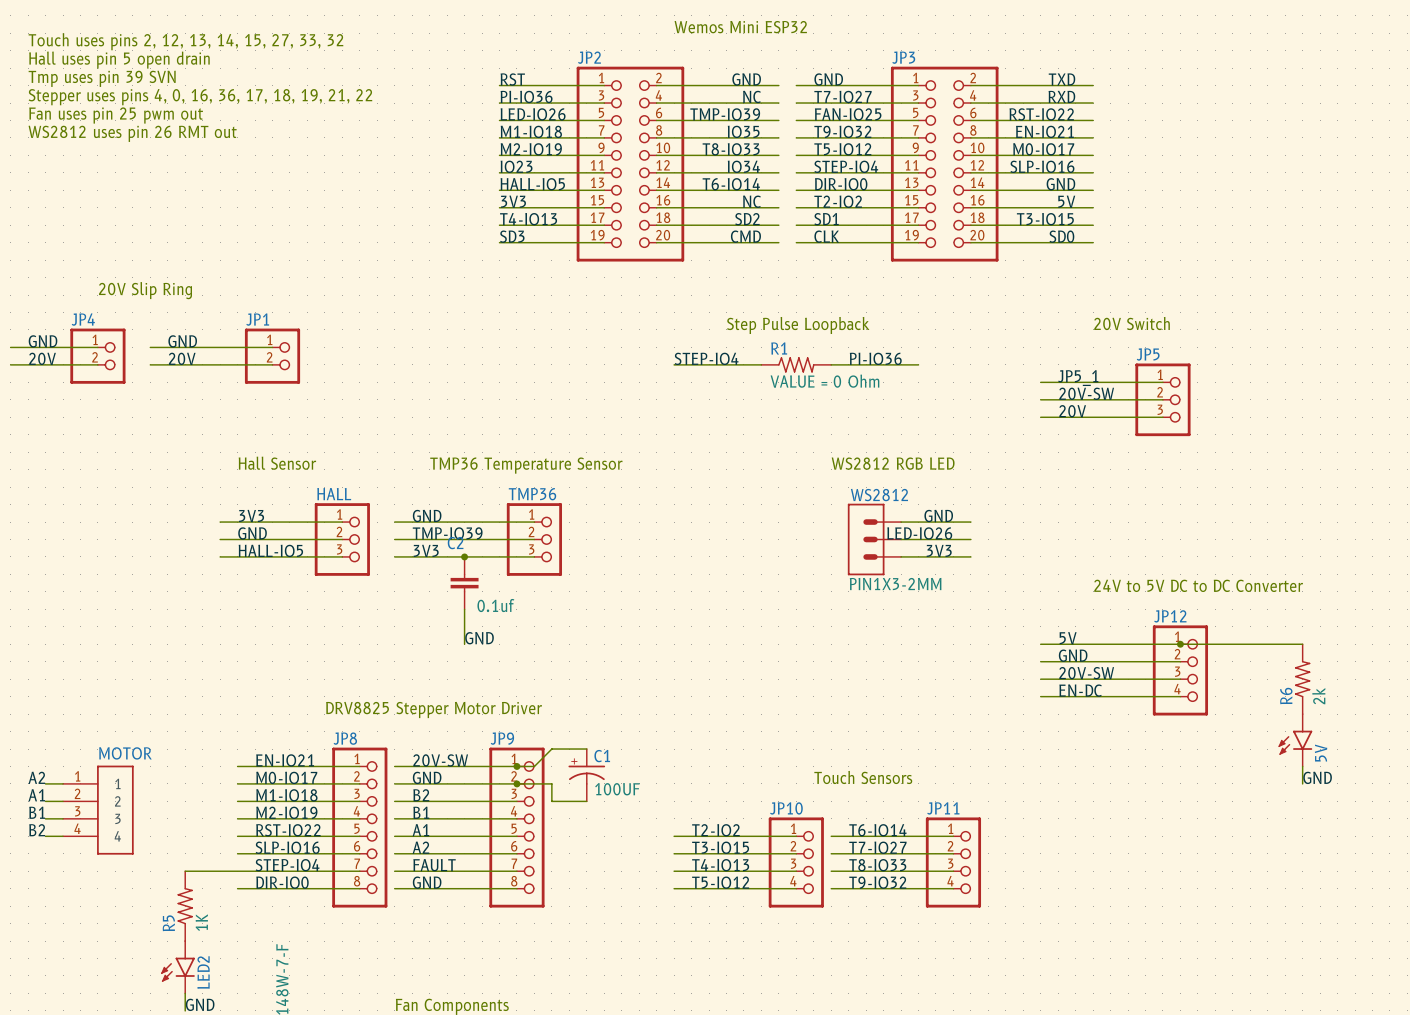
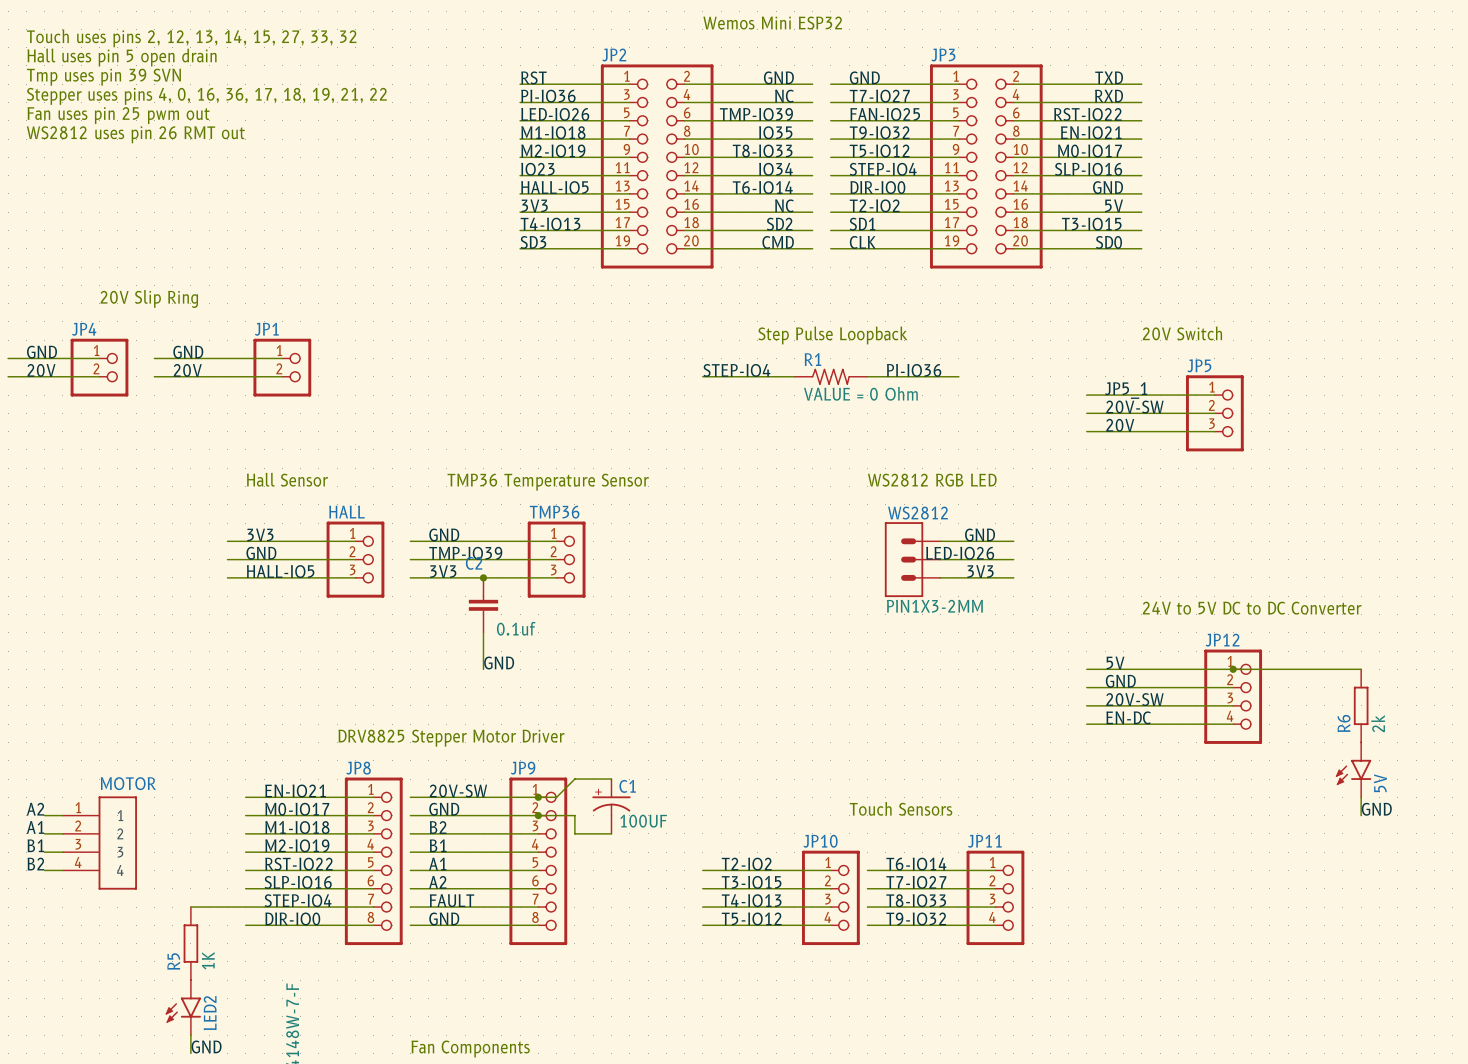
R6 symbol: [1294, 644, 1311, 715] -> [1353, 669, 1369, 743]
R5 symbol: [177, 871, 193, 942] -> [183, 907, 199, 981]

